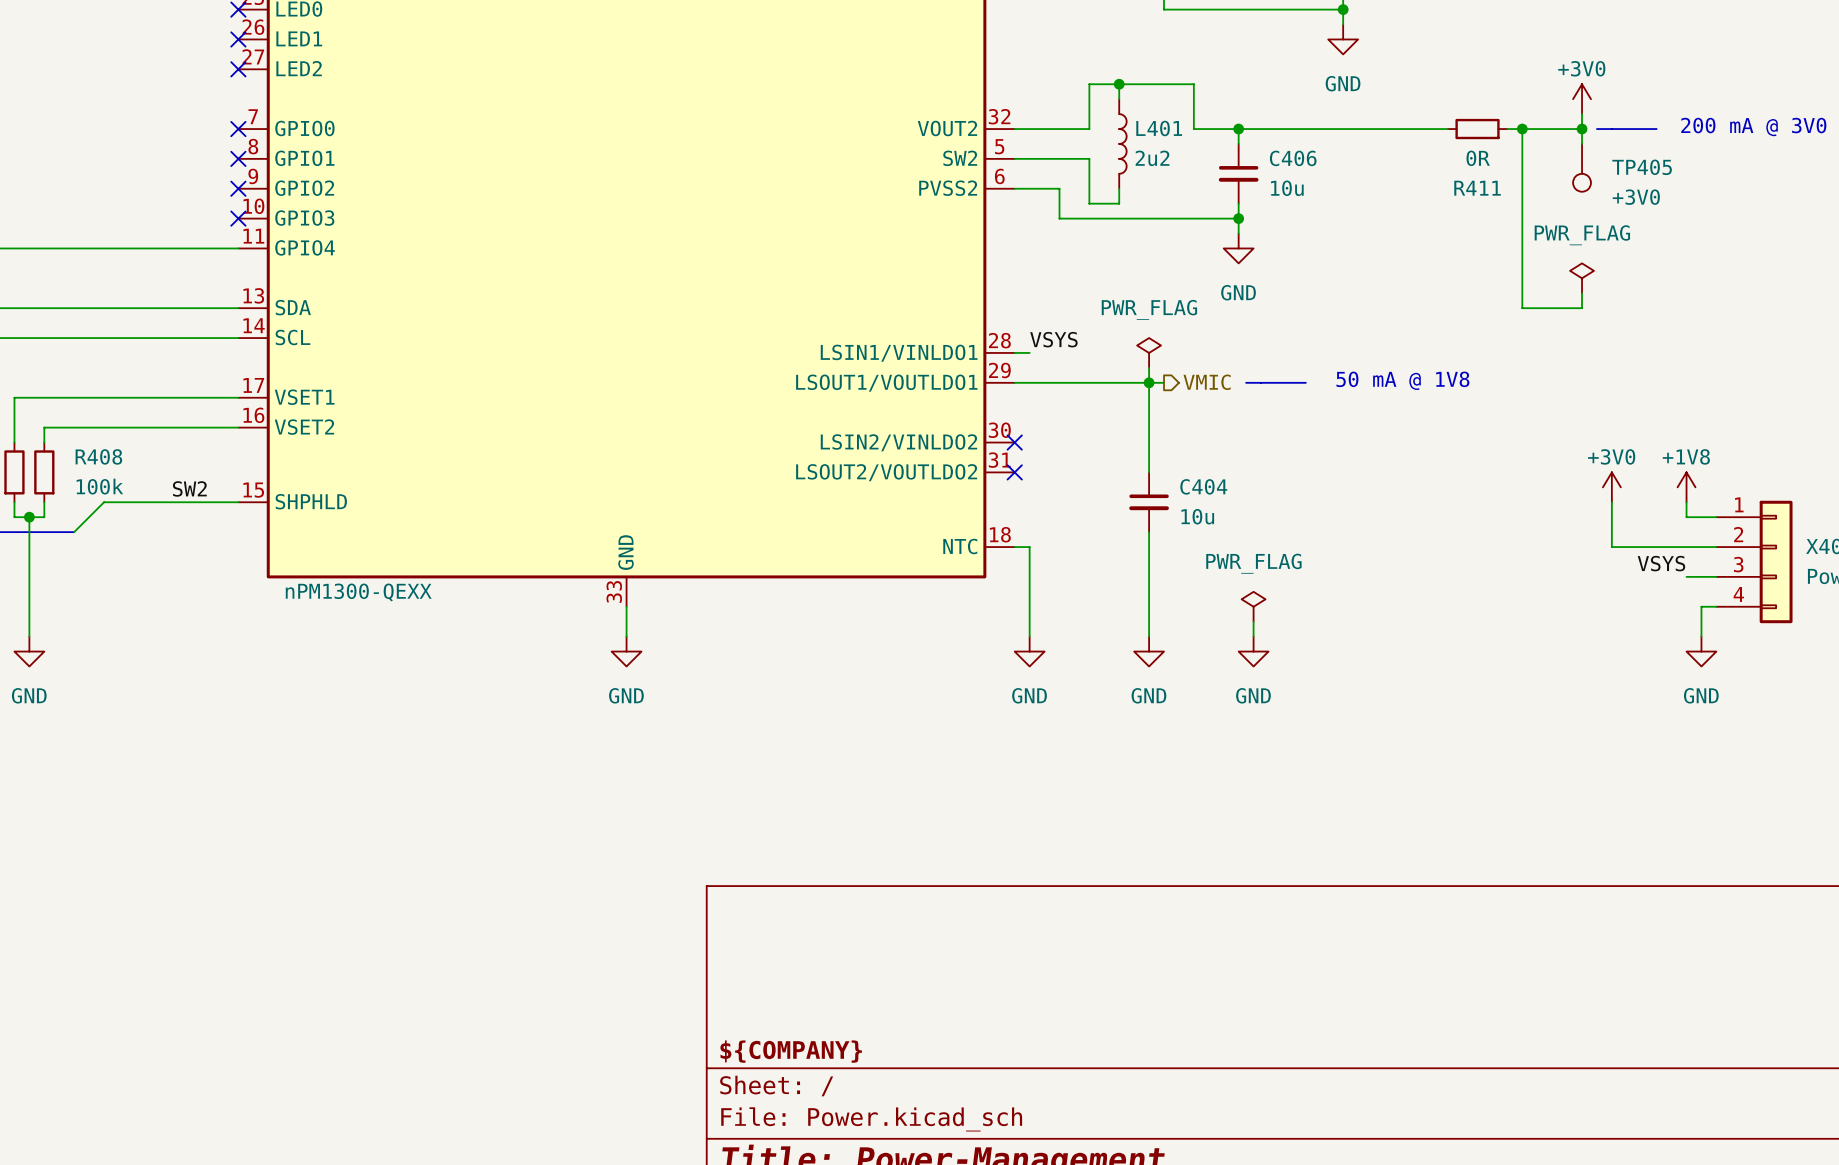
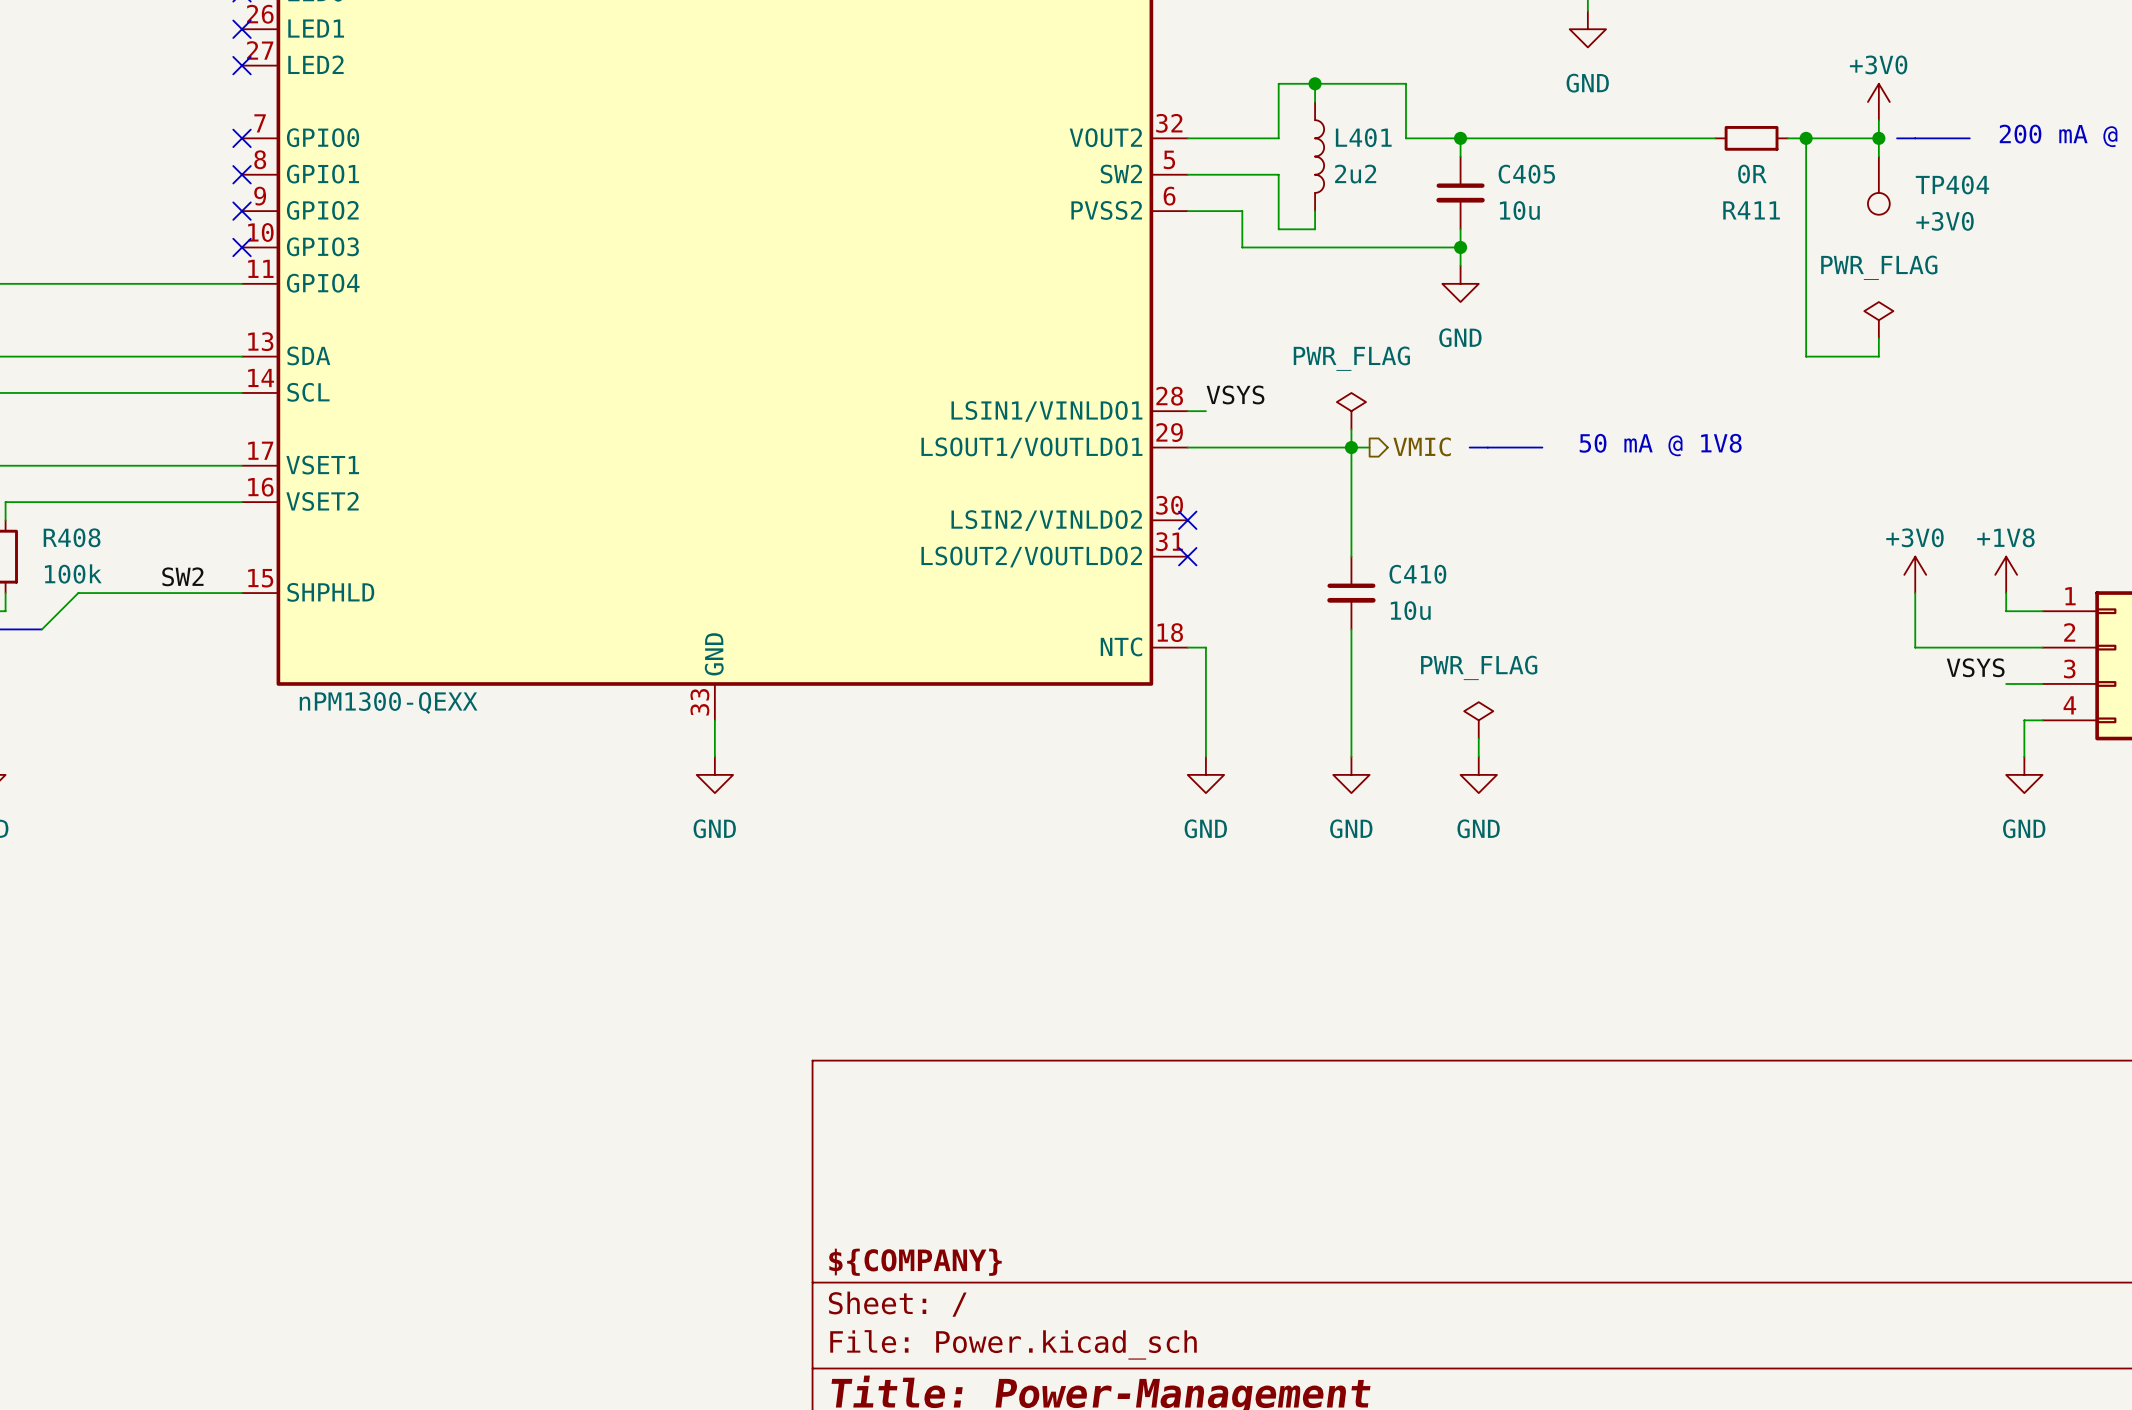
C406 name: C406 (1293, 158) -> C405 (1526, 174)
TP405 name: TP405 (1642, 167) -> TP404 (1952, 184)
C404 name: C404 (1203, 486) -> C410 (1417, 574)

